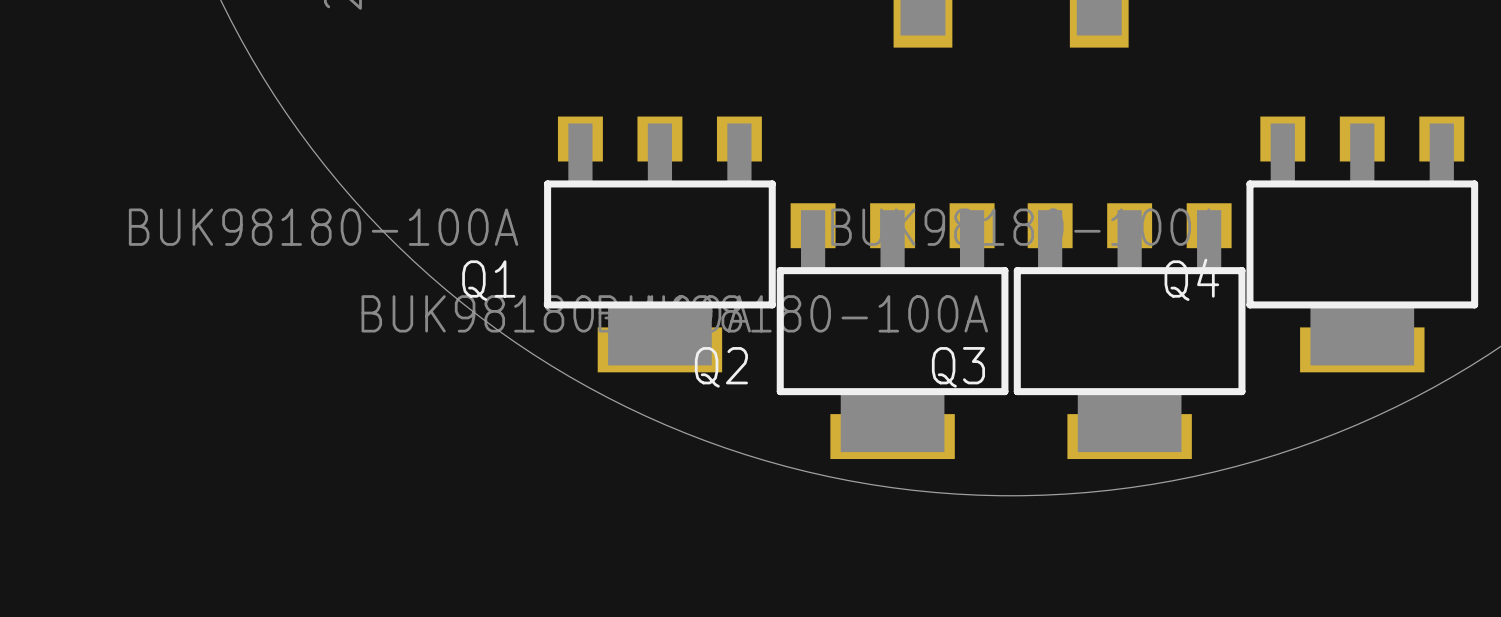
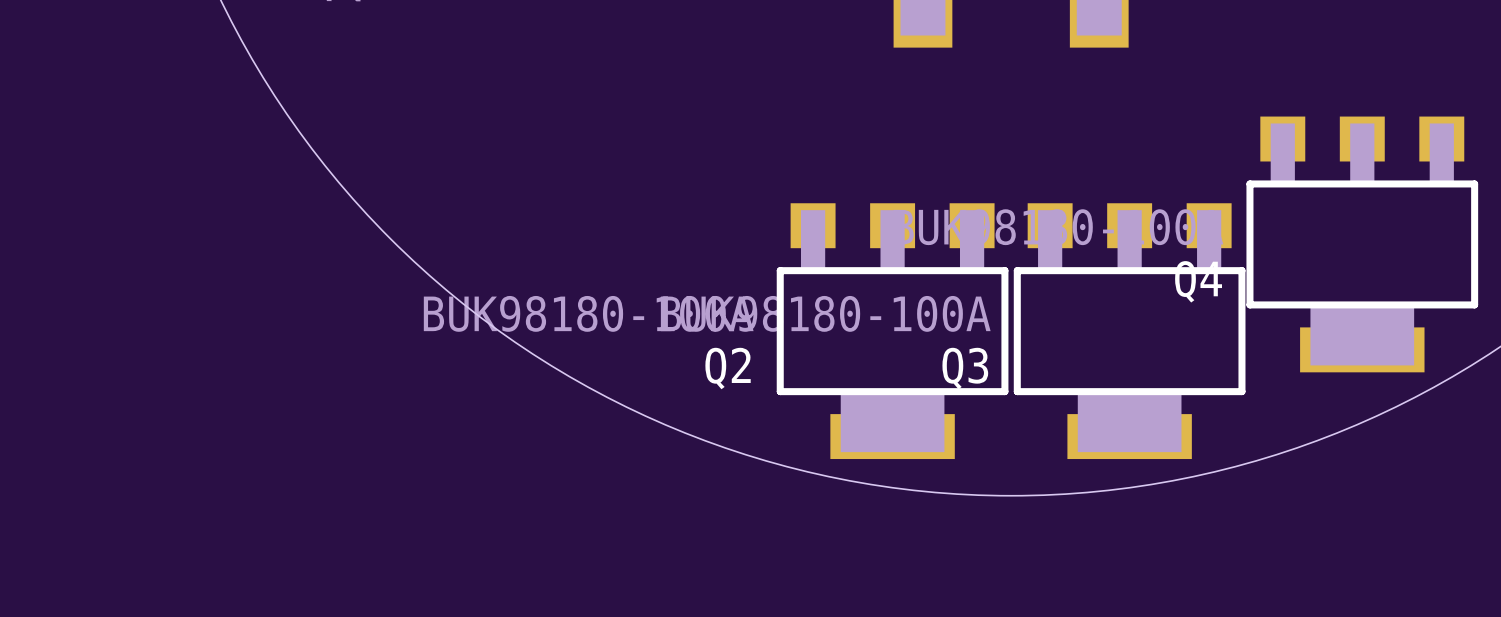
Q1: BUK98180-100A (659, 244) -> none

